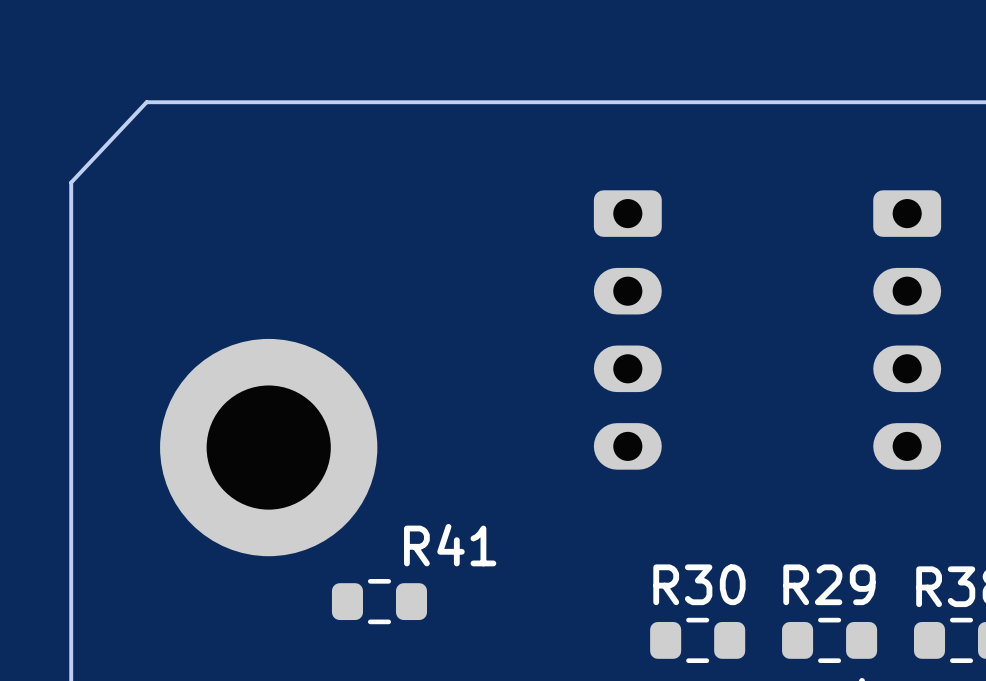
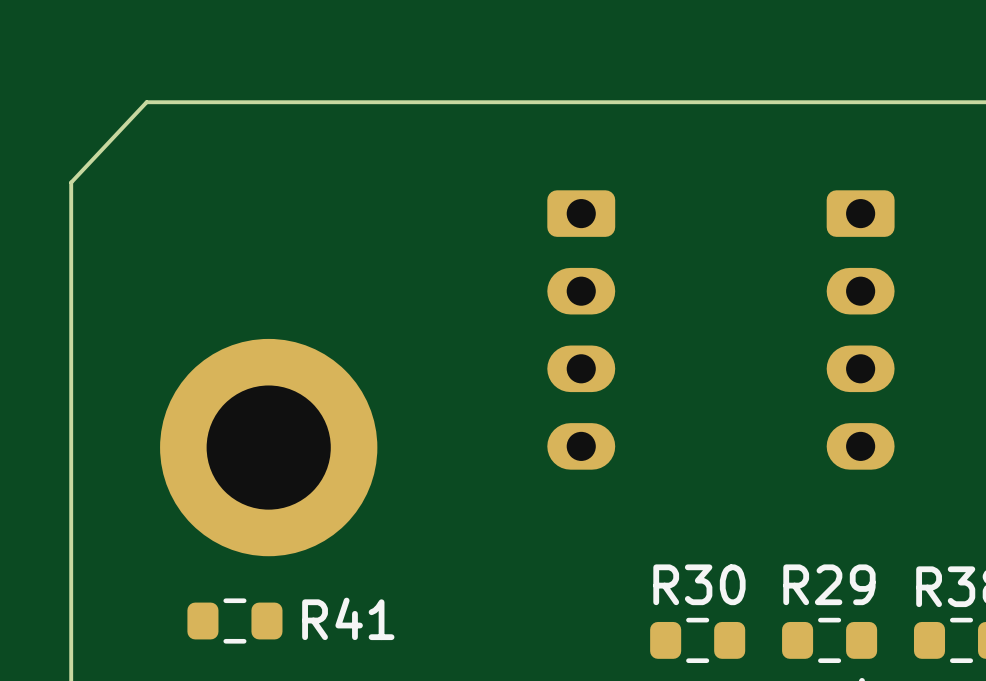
part position: (627, 329) -> (581, 329)
part position: (907, 329) -> (860, 329)
R41 name position: R41 (450, 545) -> R41 (348, 618)
R41 position: (379, 601) -> (234, 621)

